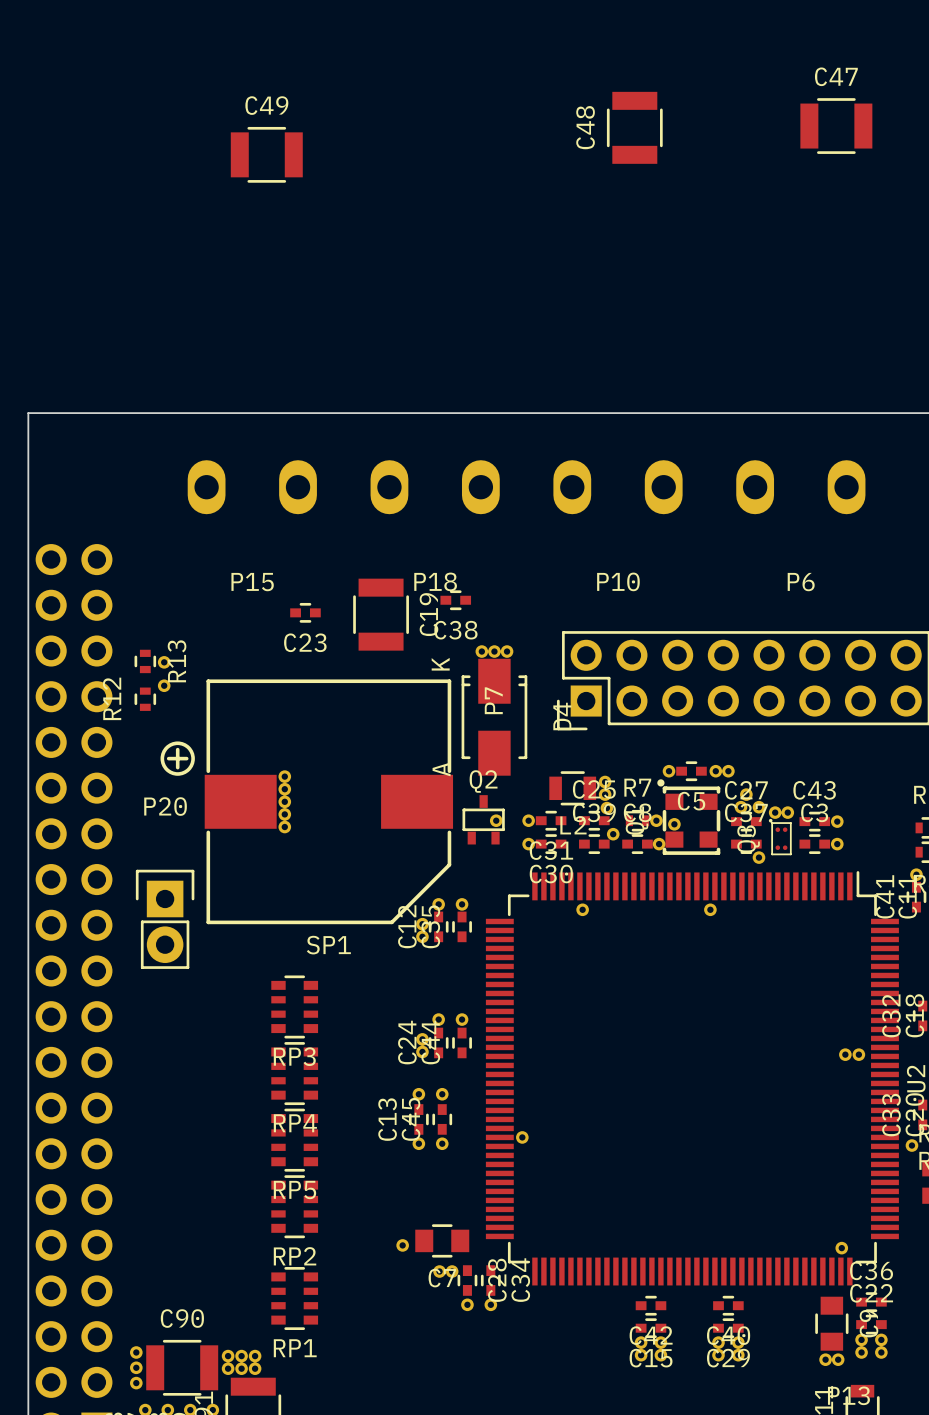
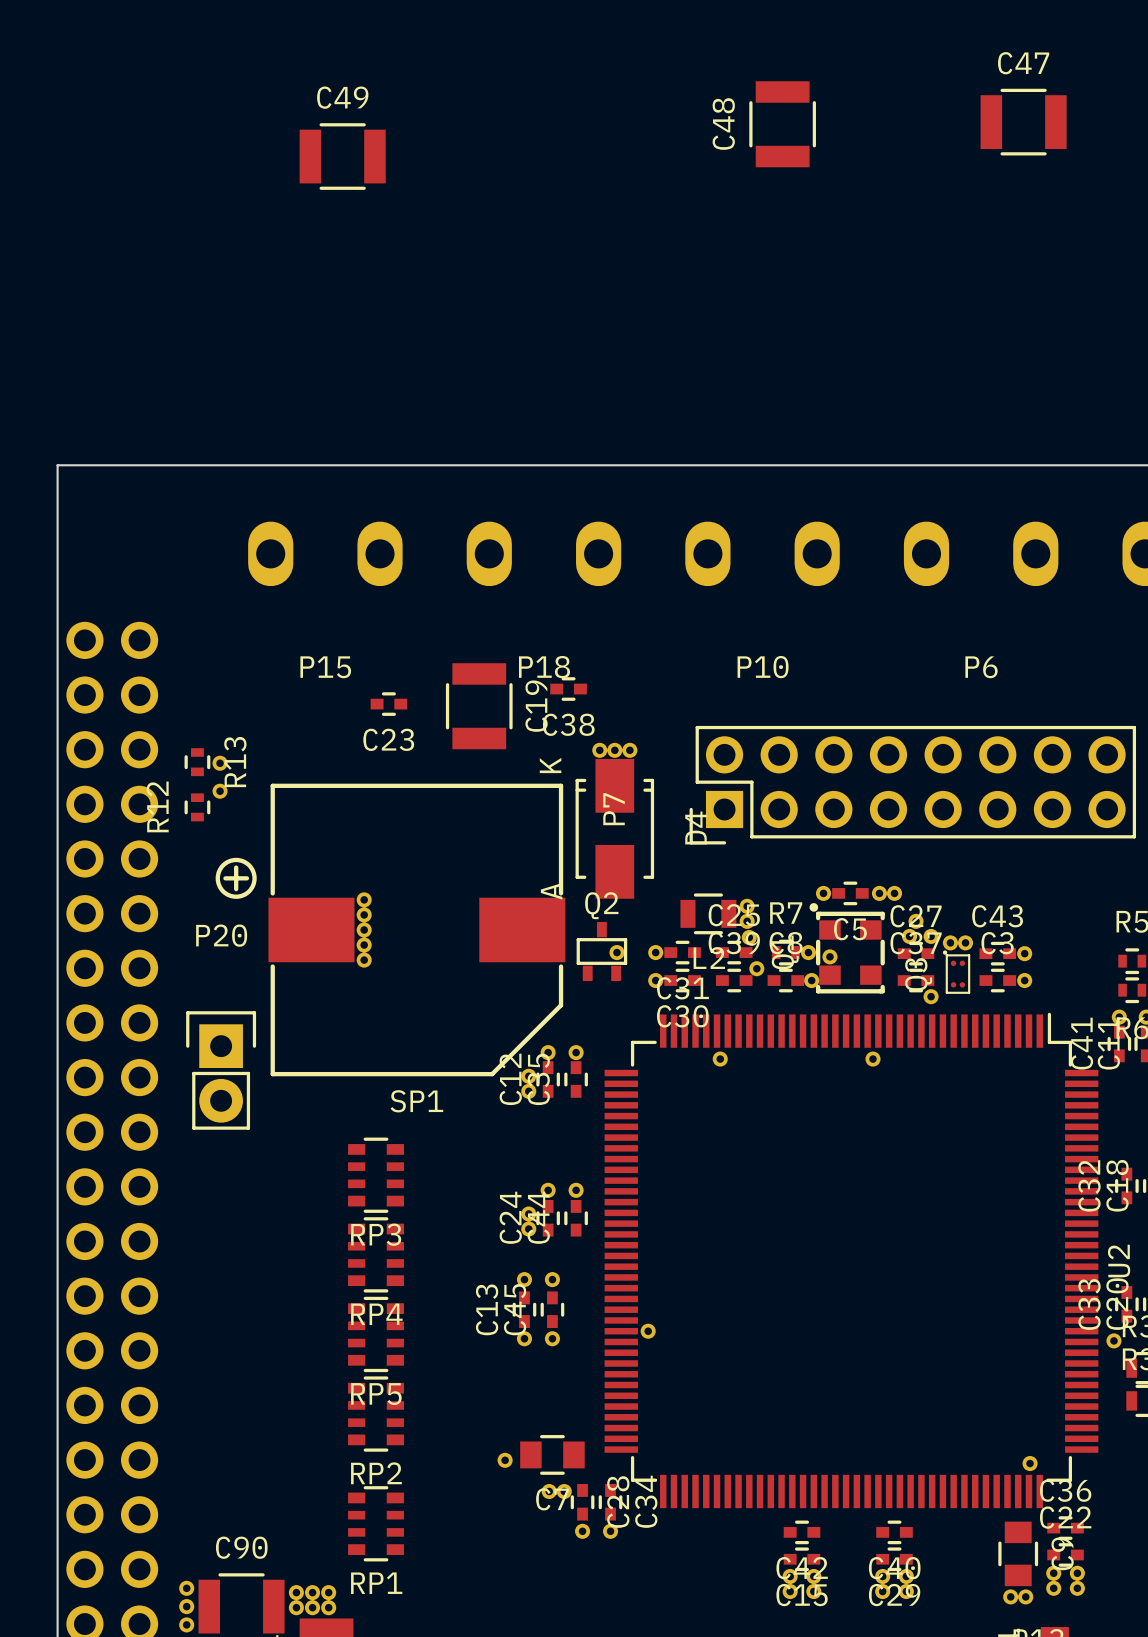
part: (845, 1054) -> none
part: (858, 1054) -> none

